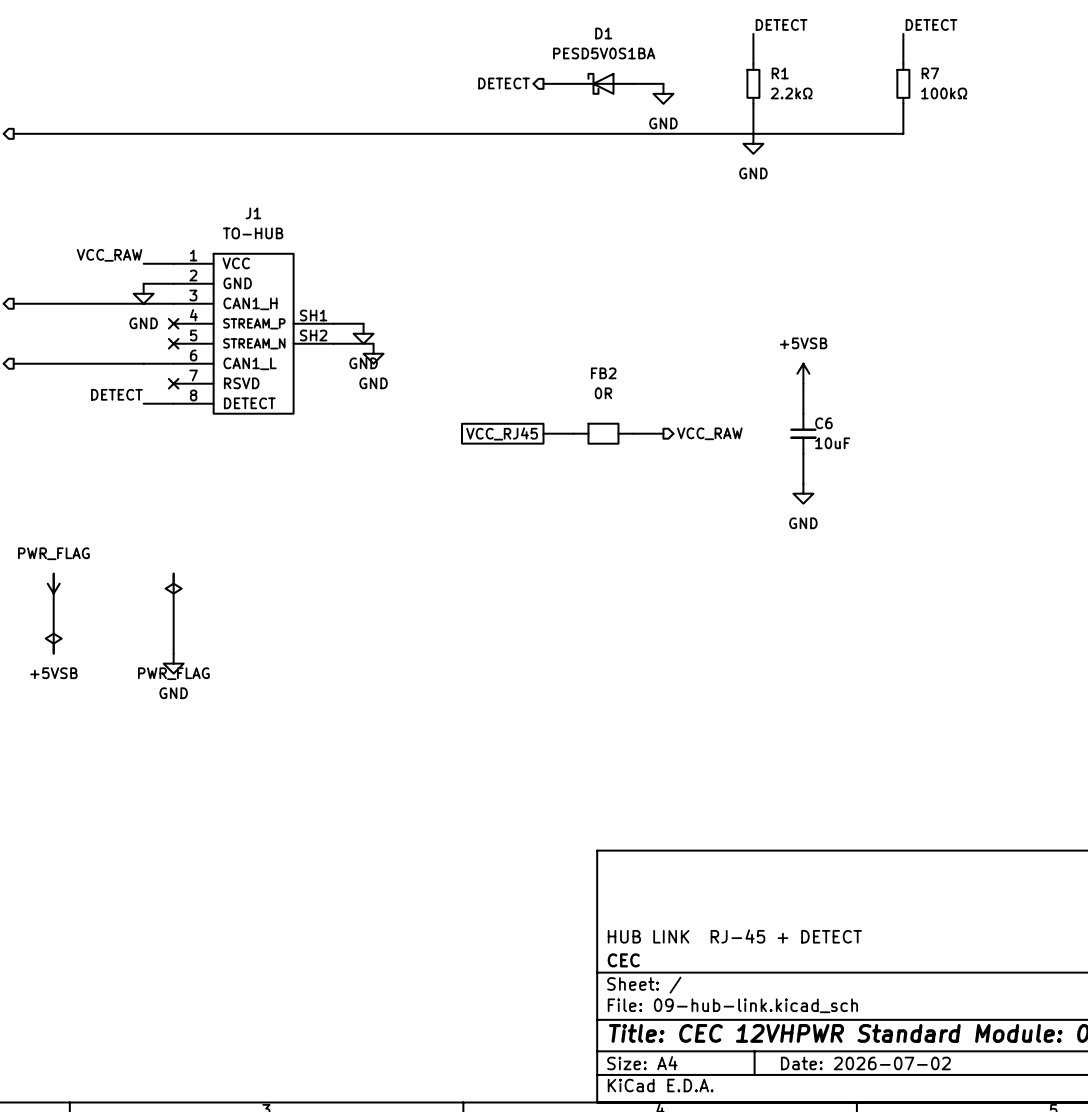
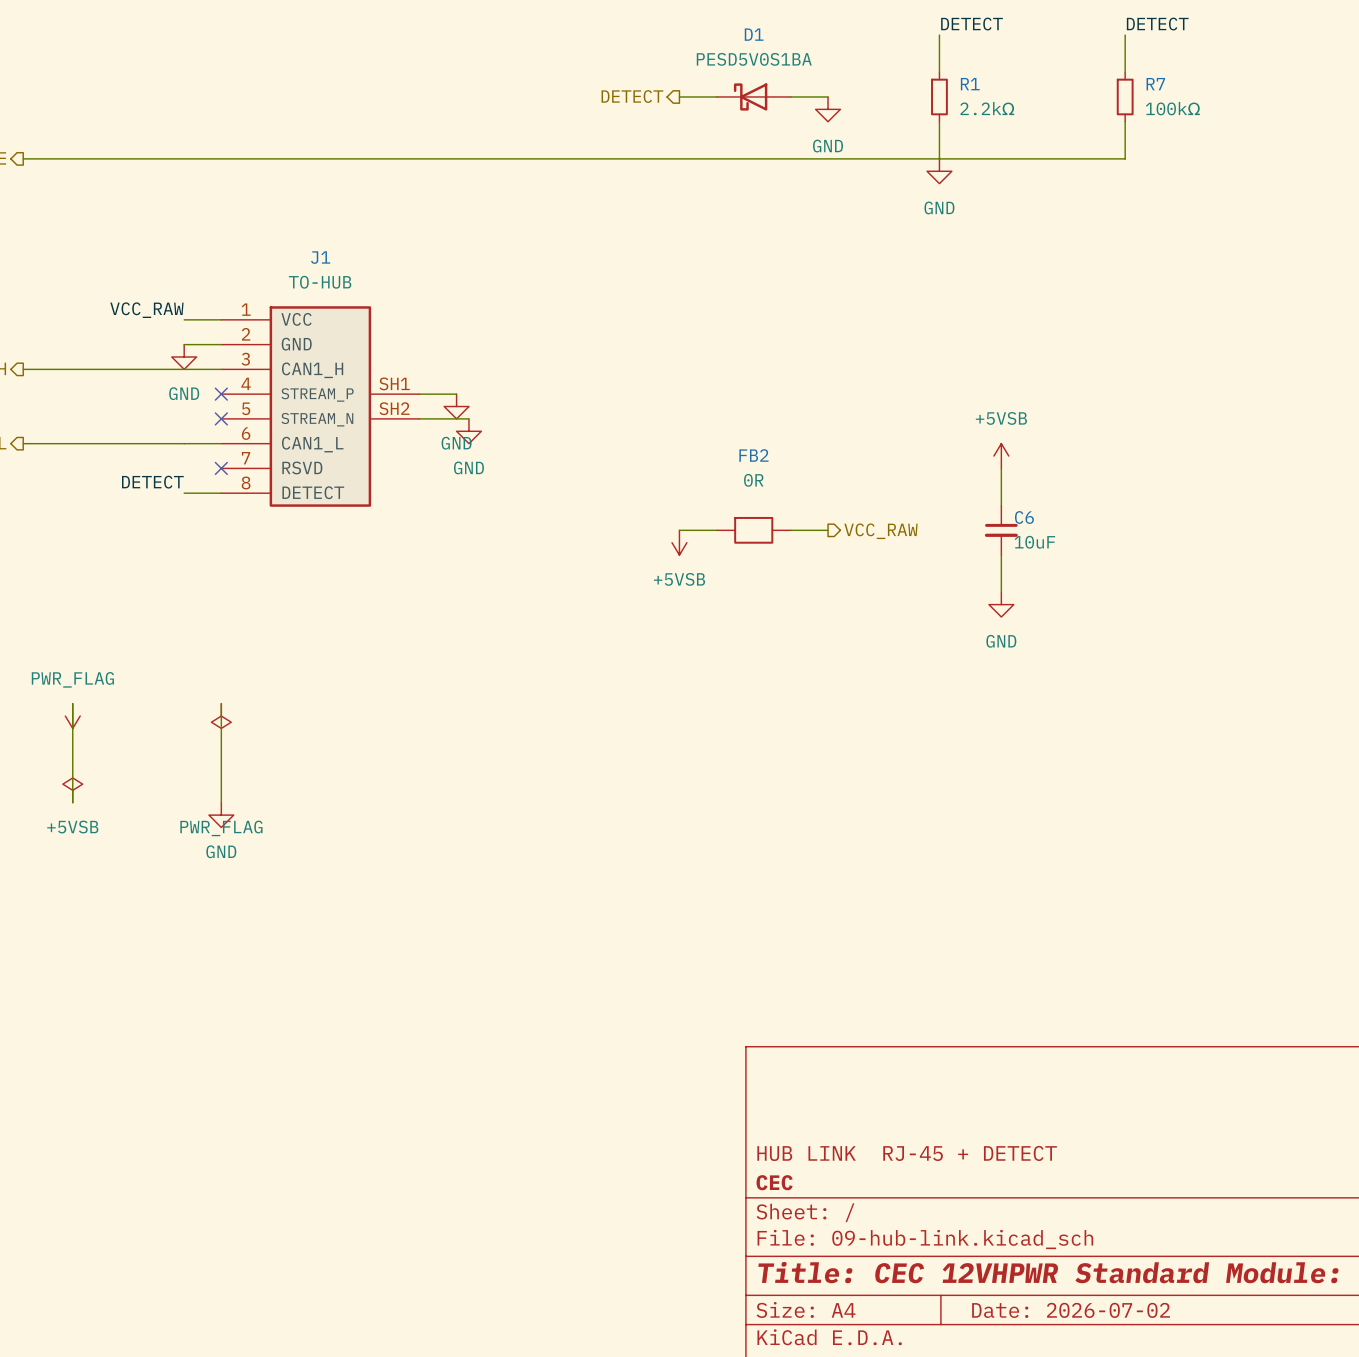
global label: VCC_RJ45 (502, 433) -> none
power symbol: none -> +5VSB (679, 542)

